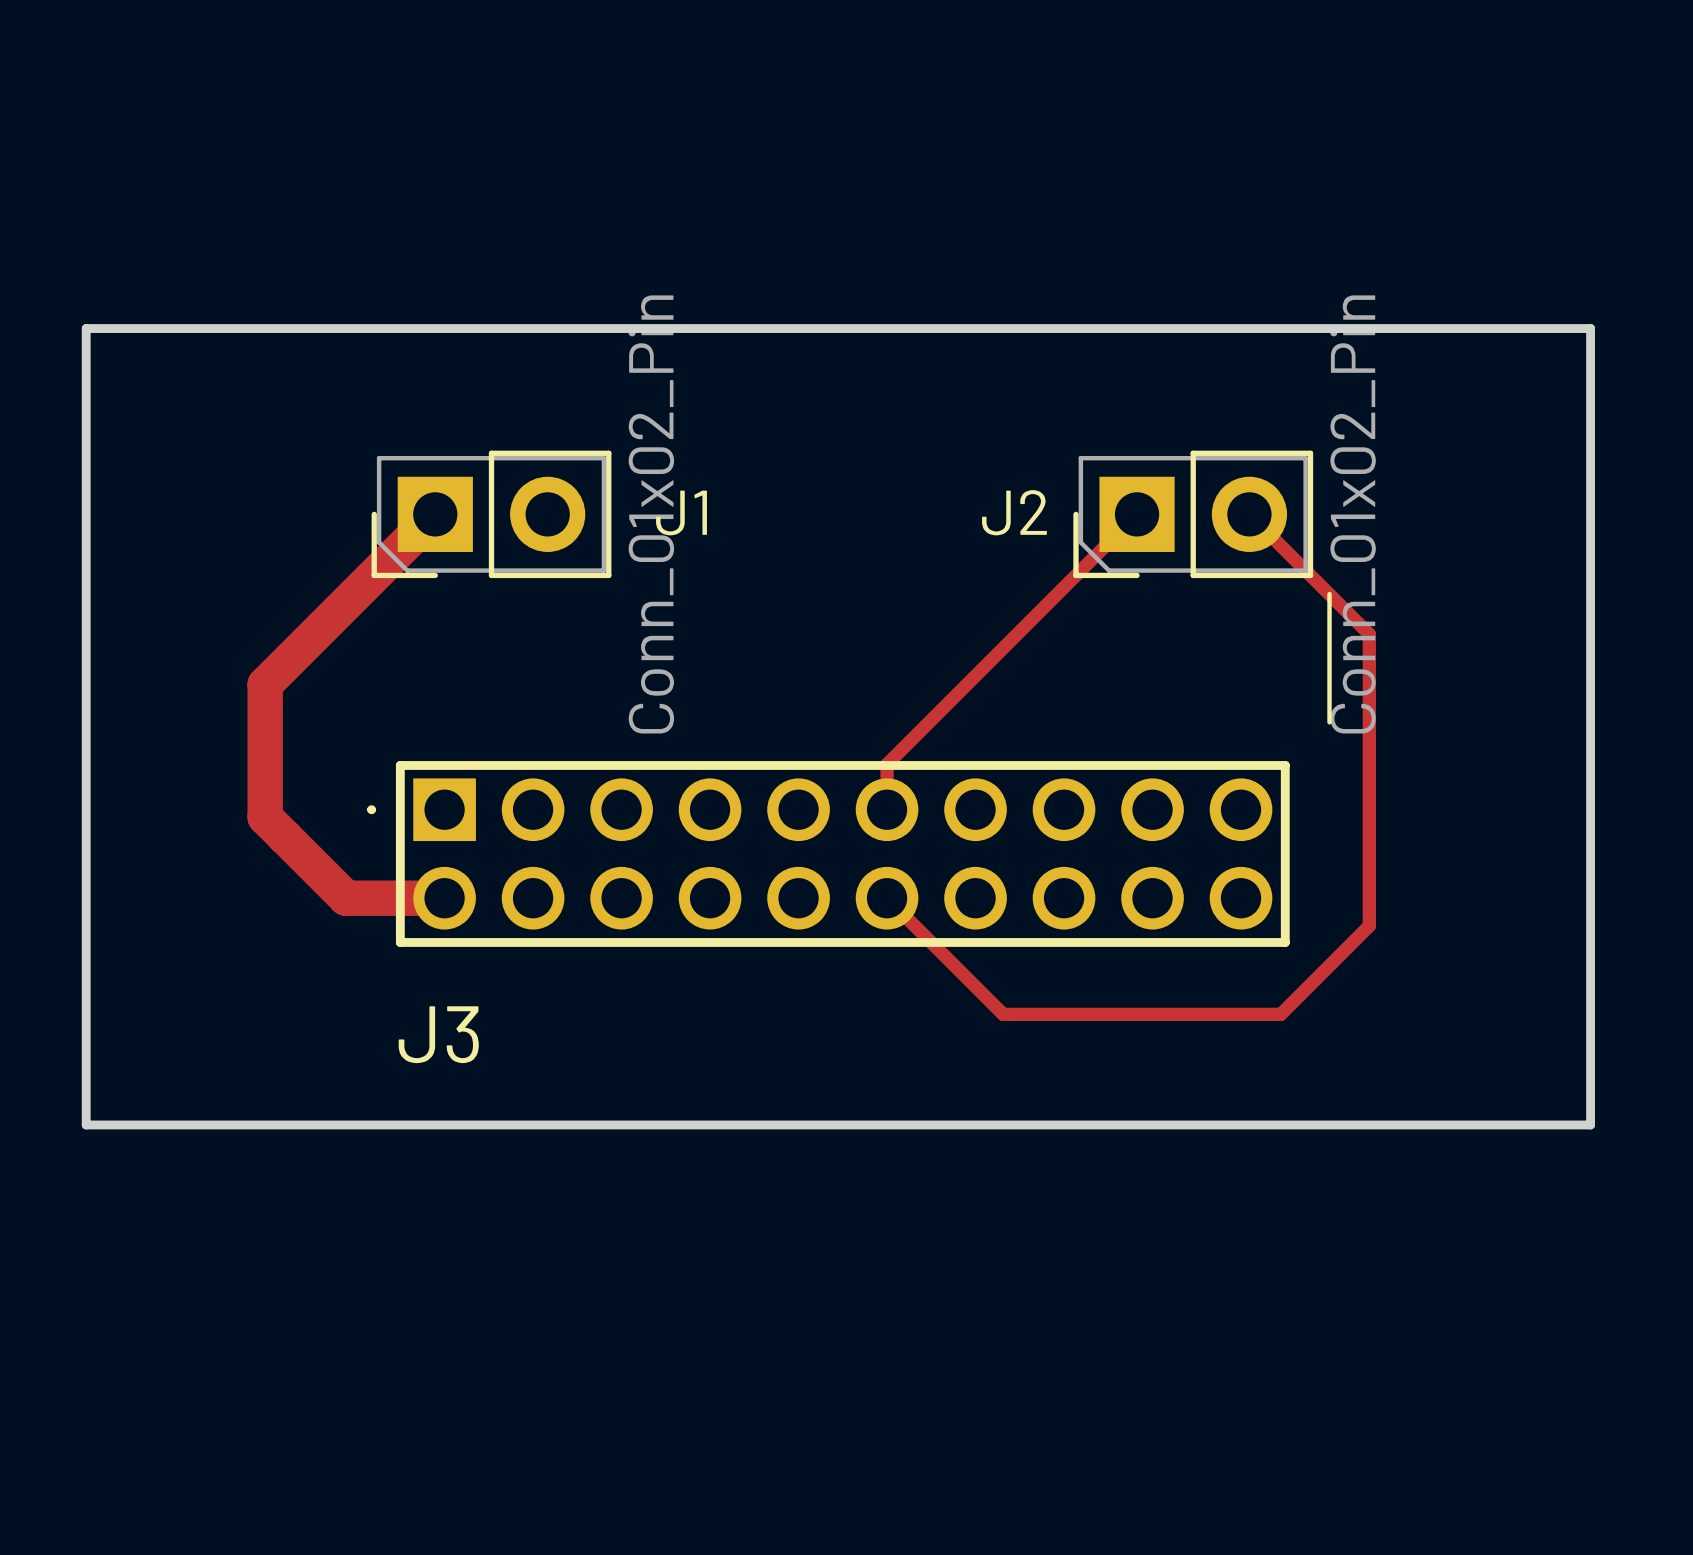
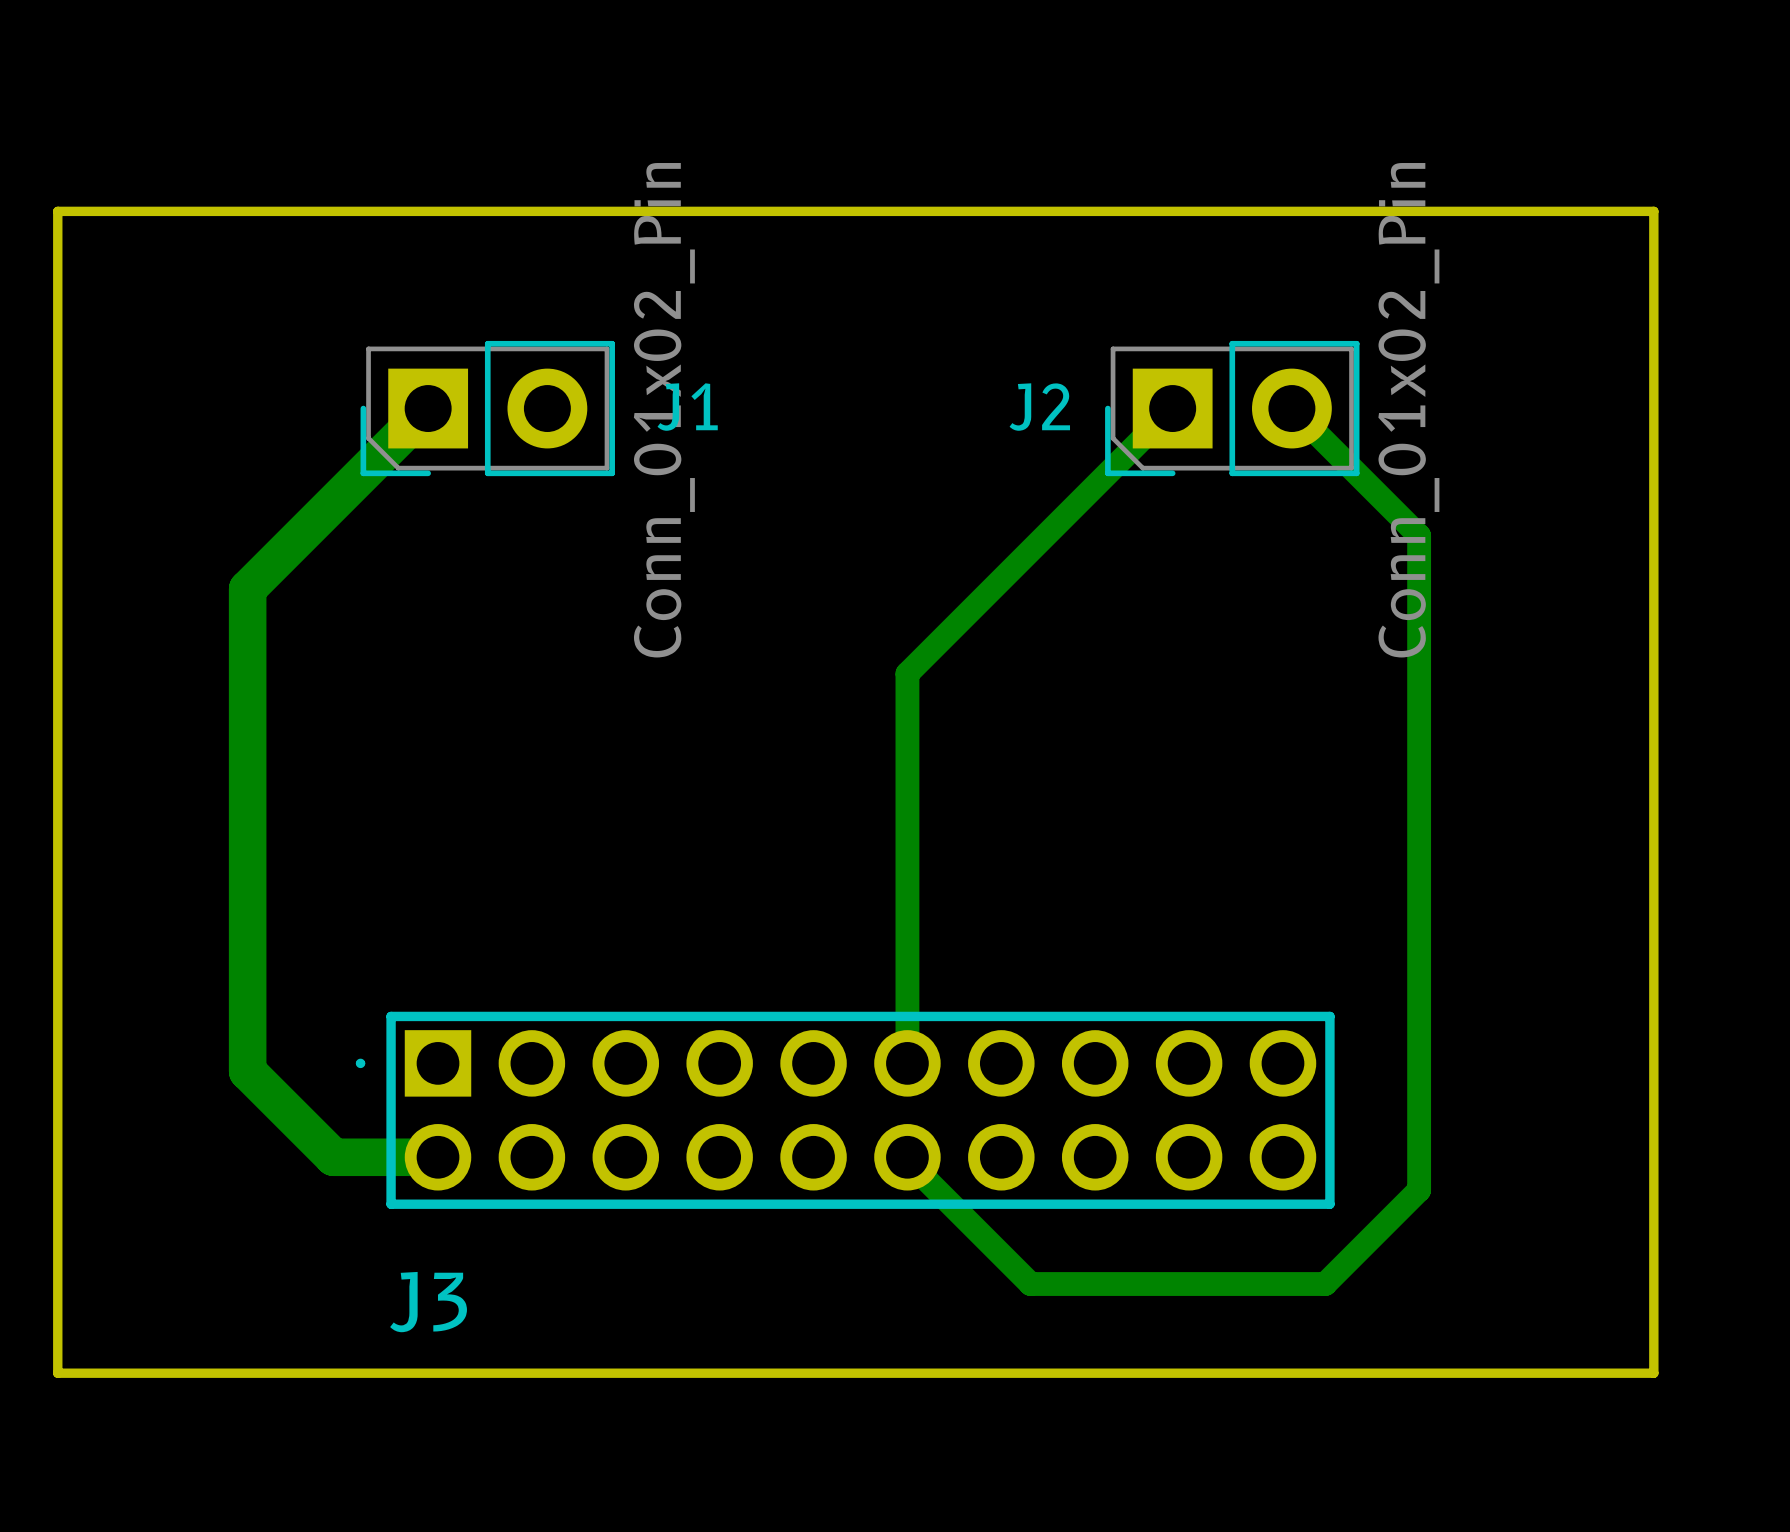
top track: (435, 514) (265, 684) (265, 817) (346, 898) (444, 898) -> none
bottom track: none -> (428, 408) (247, 589) (247, 1071) (333, 1157) (438, 1157)
top track: (1137, 514) (887, 764) (887, 809) -> none
bottom track: none -> (1172, 408) (907, 673) (907, 1063)
top track: (1249, 514) (1369, 634) (1369, 925) (1280, 1014) (1003, 1014) (887, 898) -> none
bottom track: none -> (1291, 408) (1419, 535) (1419, 1190) (1325, 1284) (1030, 1284) (907, 1160)
line: (1329, 594) (1329, 722) -> none
J3 position: (828, 853) -> (845, 1110)
board edge: (86, 1124) (1590, 1124) -> (57, 1056) (57, 1373) (1653, 1373) (1653, 1056)

